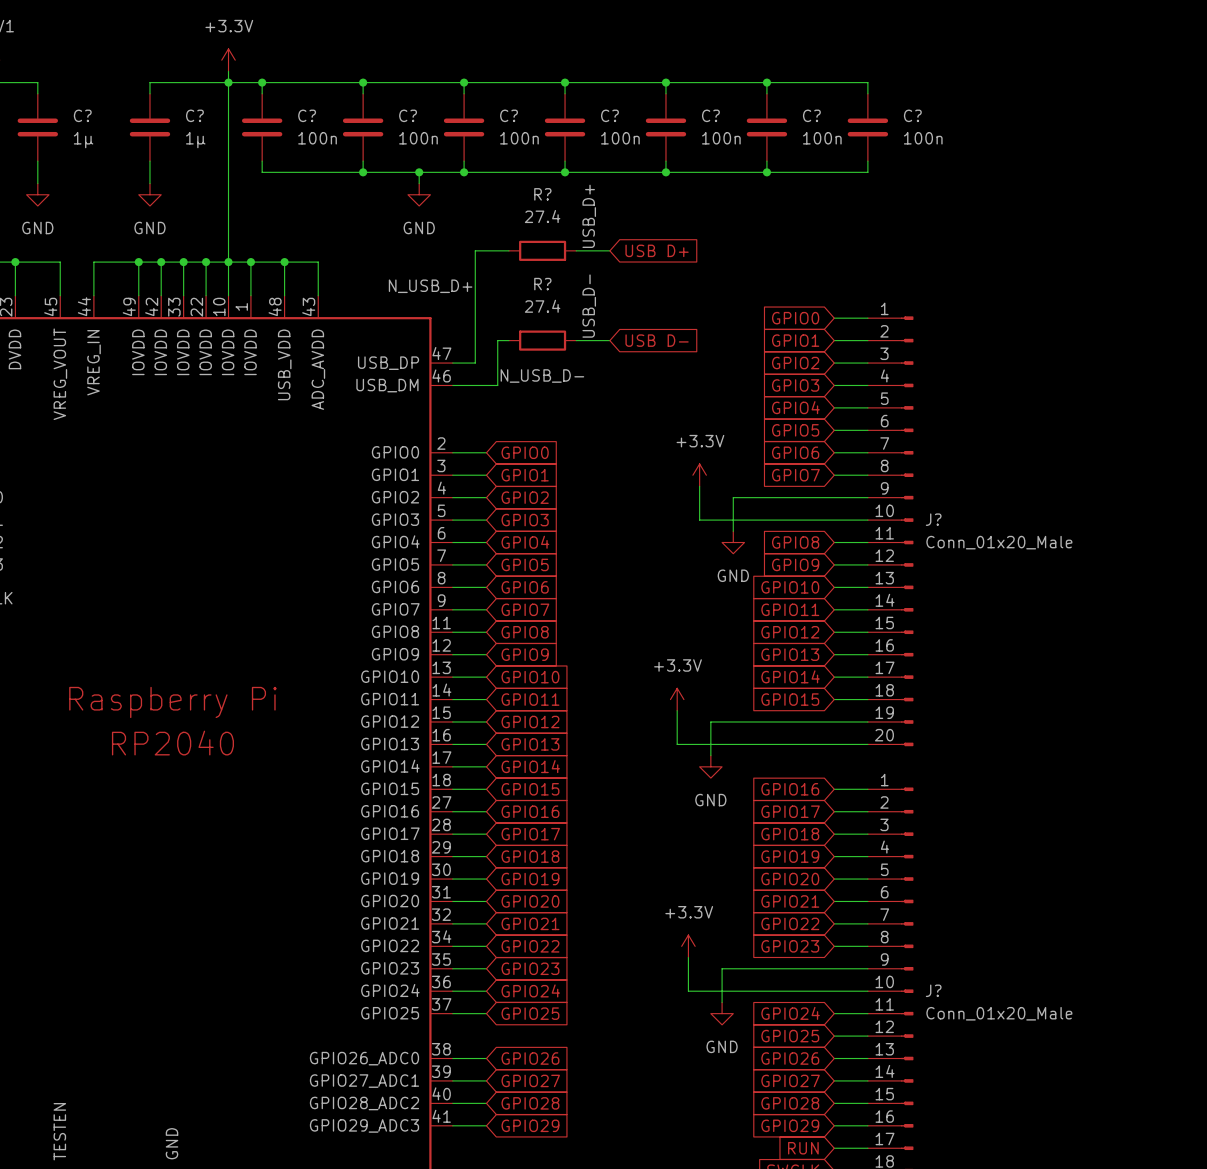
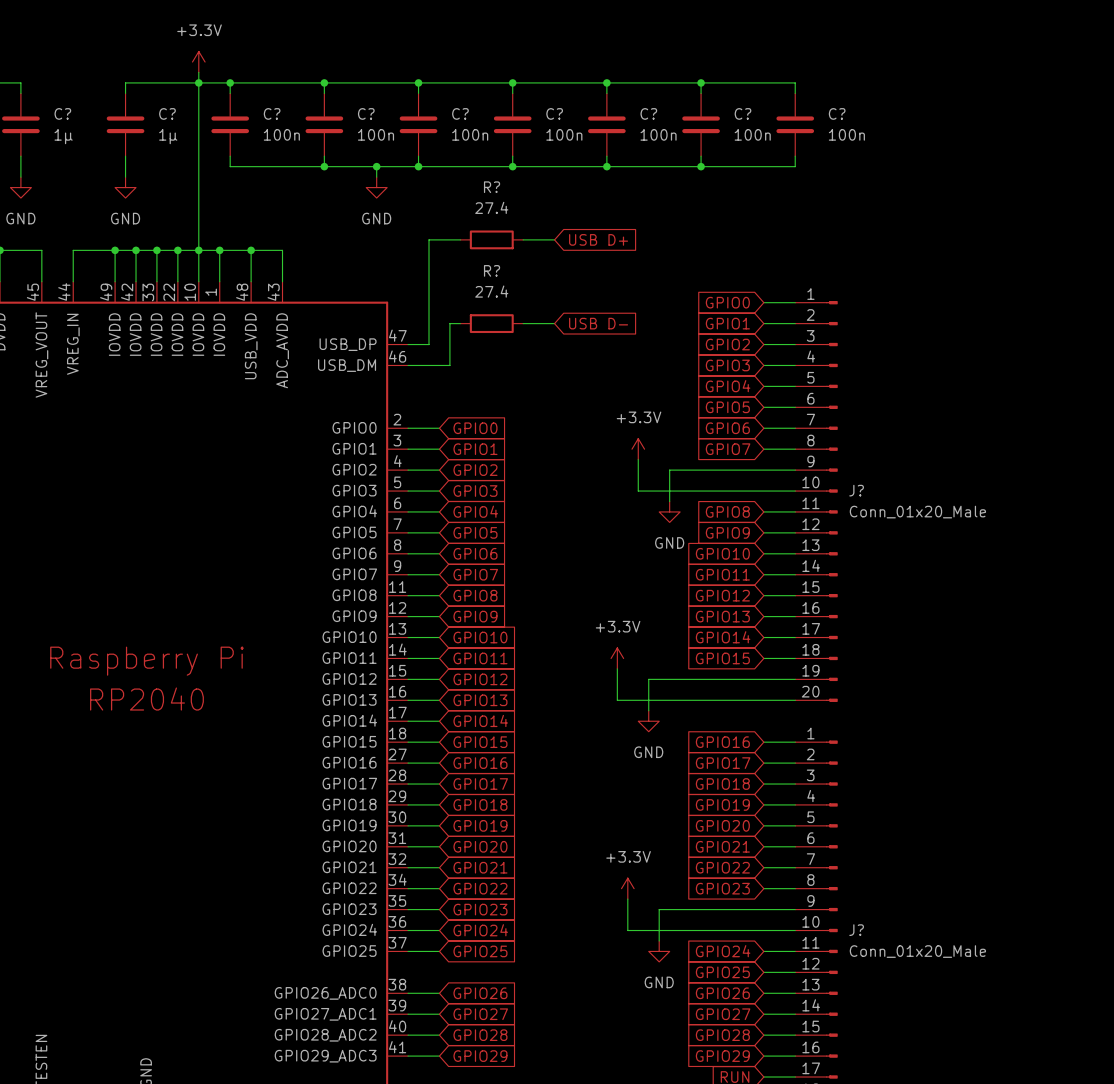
label: USB_D+ (589, 216) -> none
label: N_USB_D+ (430, 286) -> none
label: USB_D- (589, 306) -> none
label: N_USB_D- (542, 375) -> none

